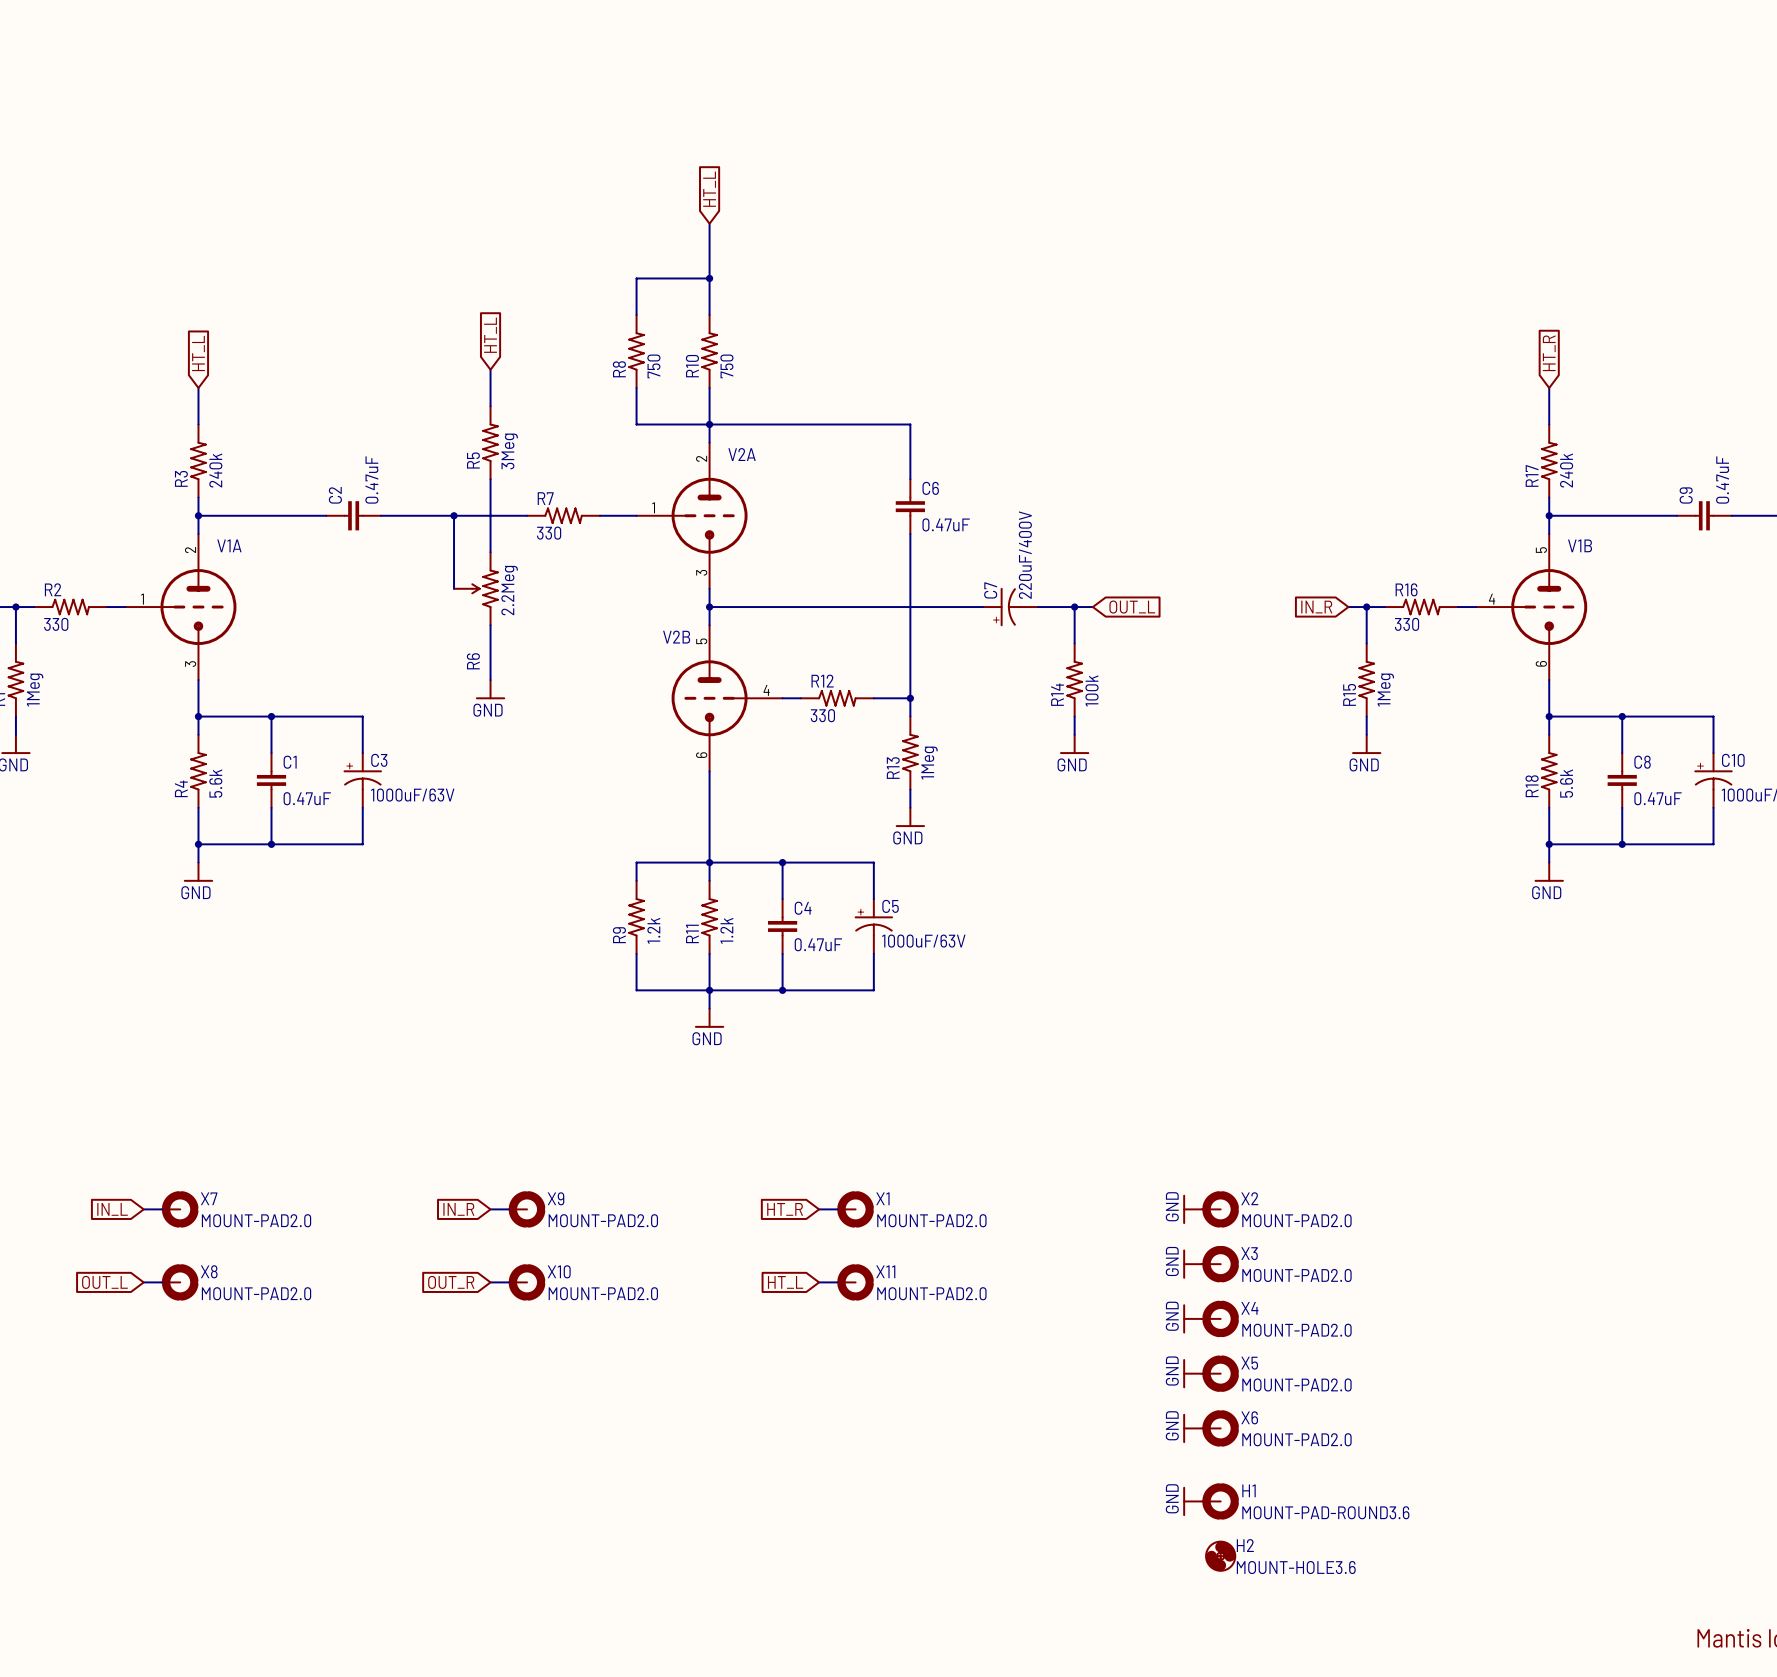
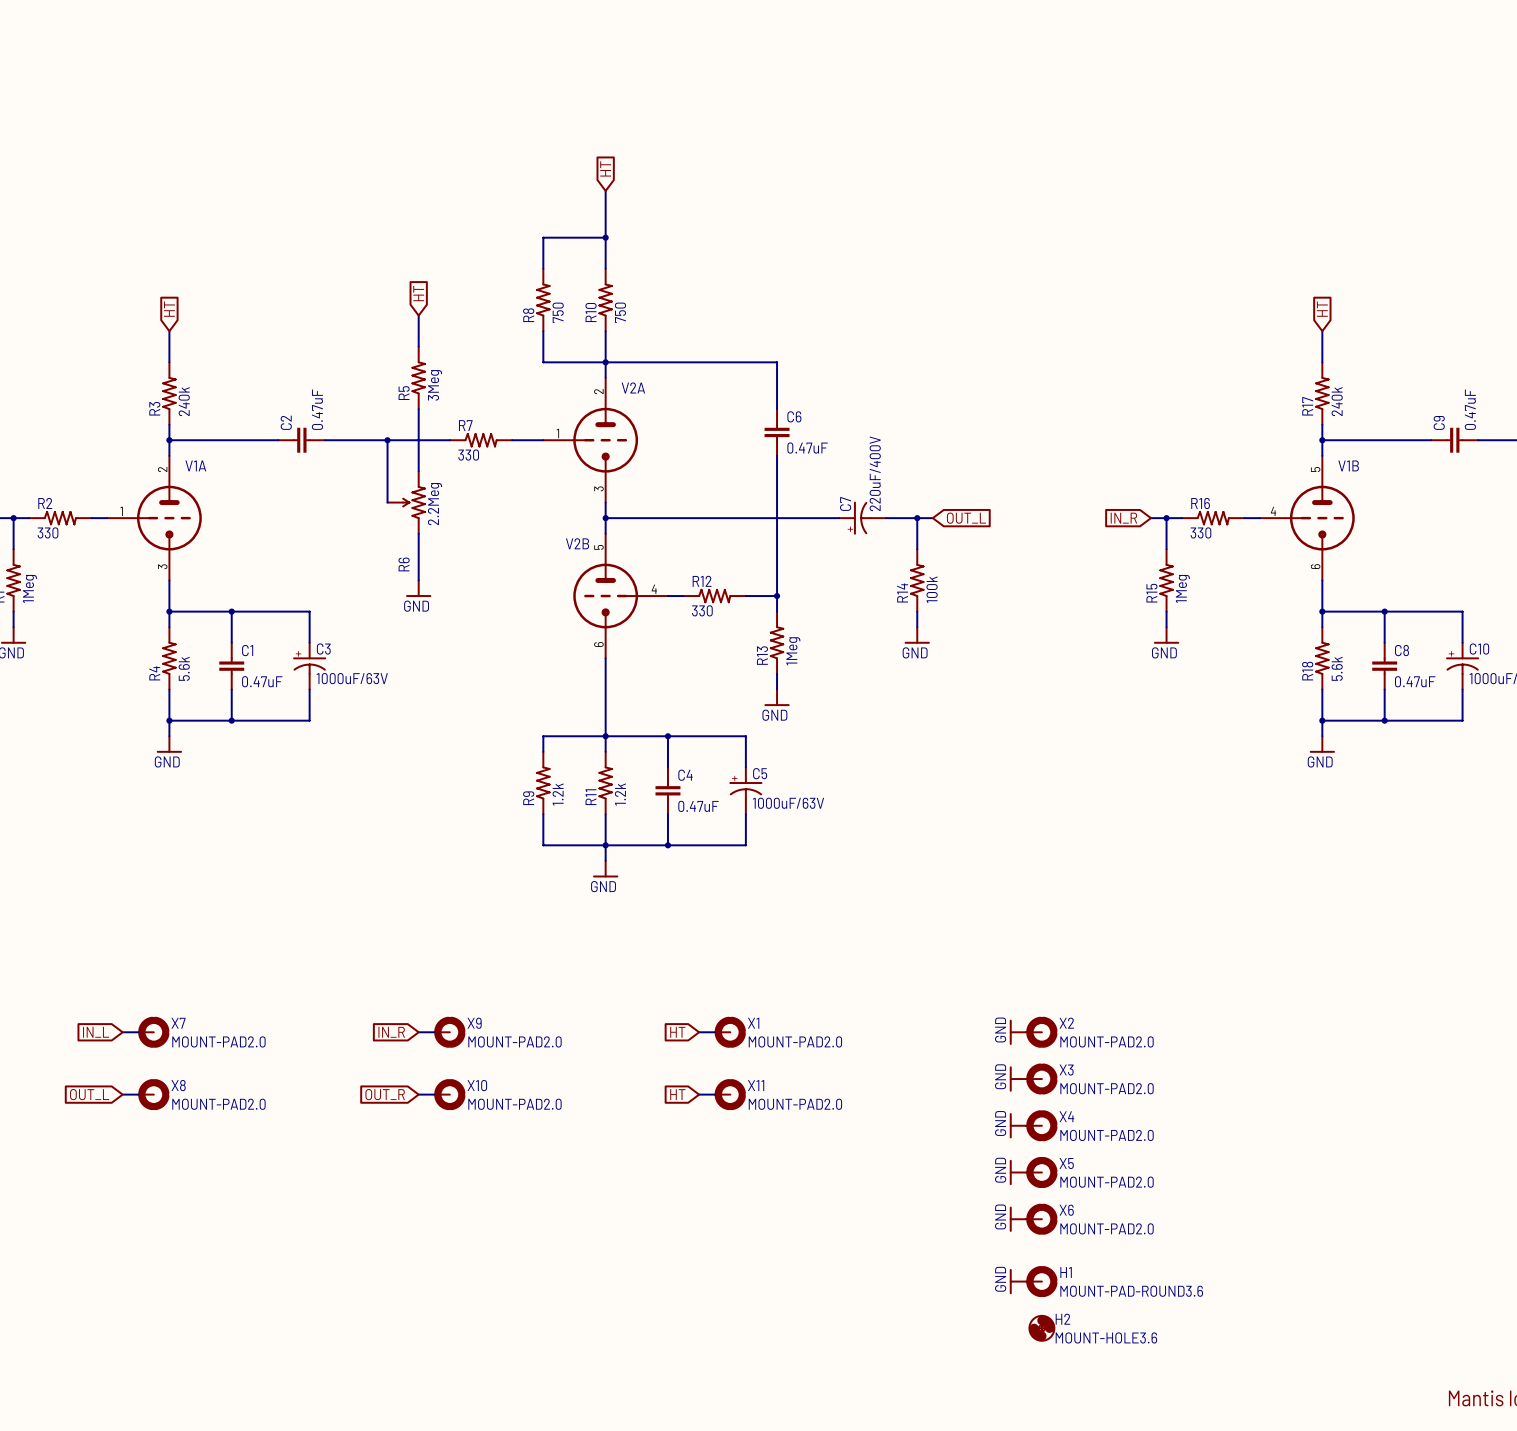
global label: HT_L (709, 189) -> HT (605, 168)
global label: HT_L (490, 335) -> HT (418, 293)
global label: HT_L (198, 353) -> HT (169, 309)
global label: HT_R (1549, 353) -> HT (1322, 309)
global label: HT_R (785, 1209) -> HT (677, 1032)
global label: HT_L (785, 1282) -> HT (677, 1094)

